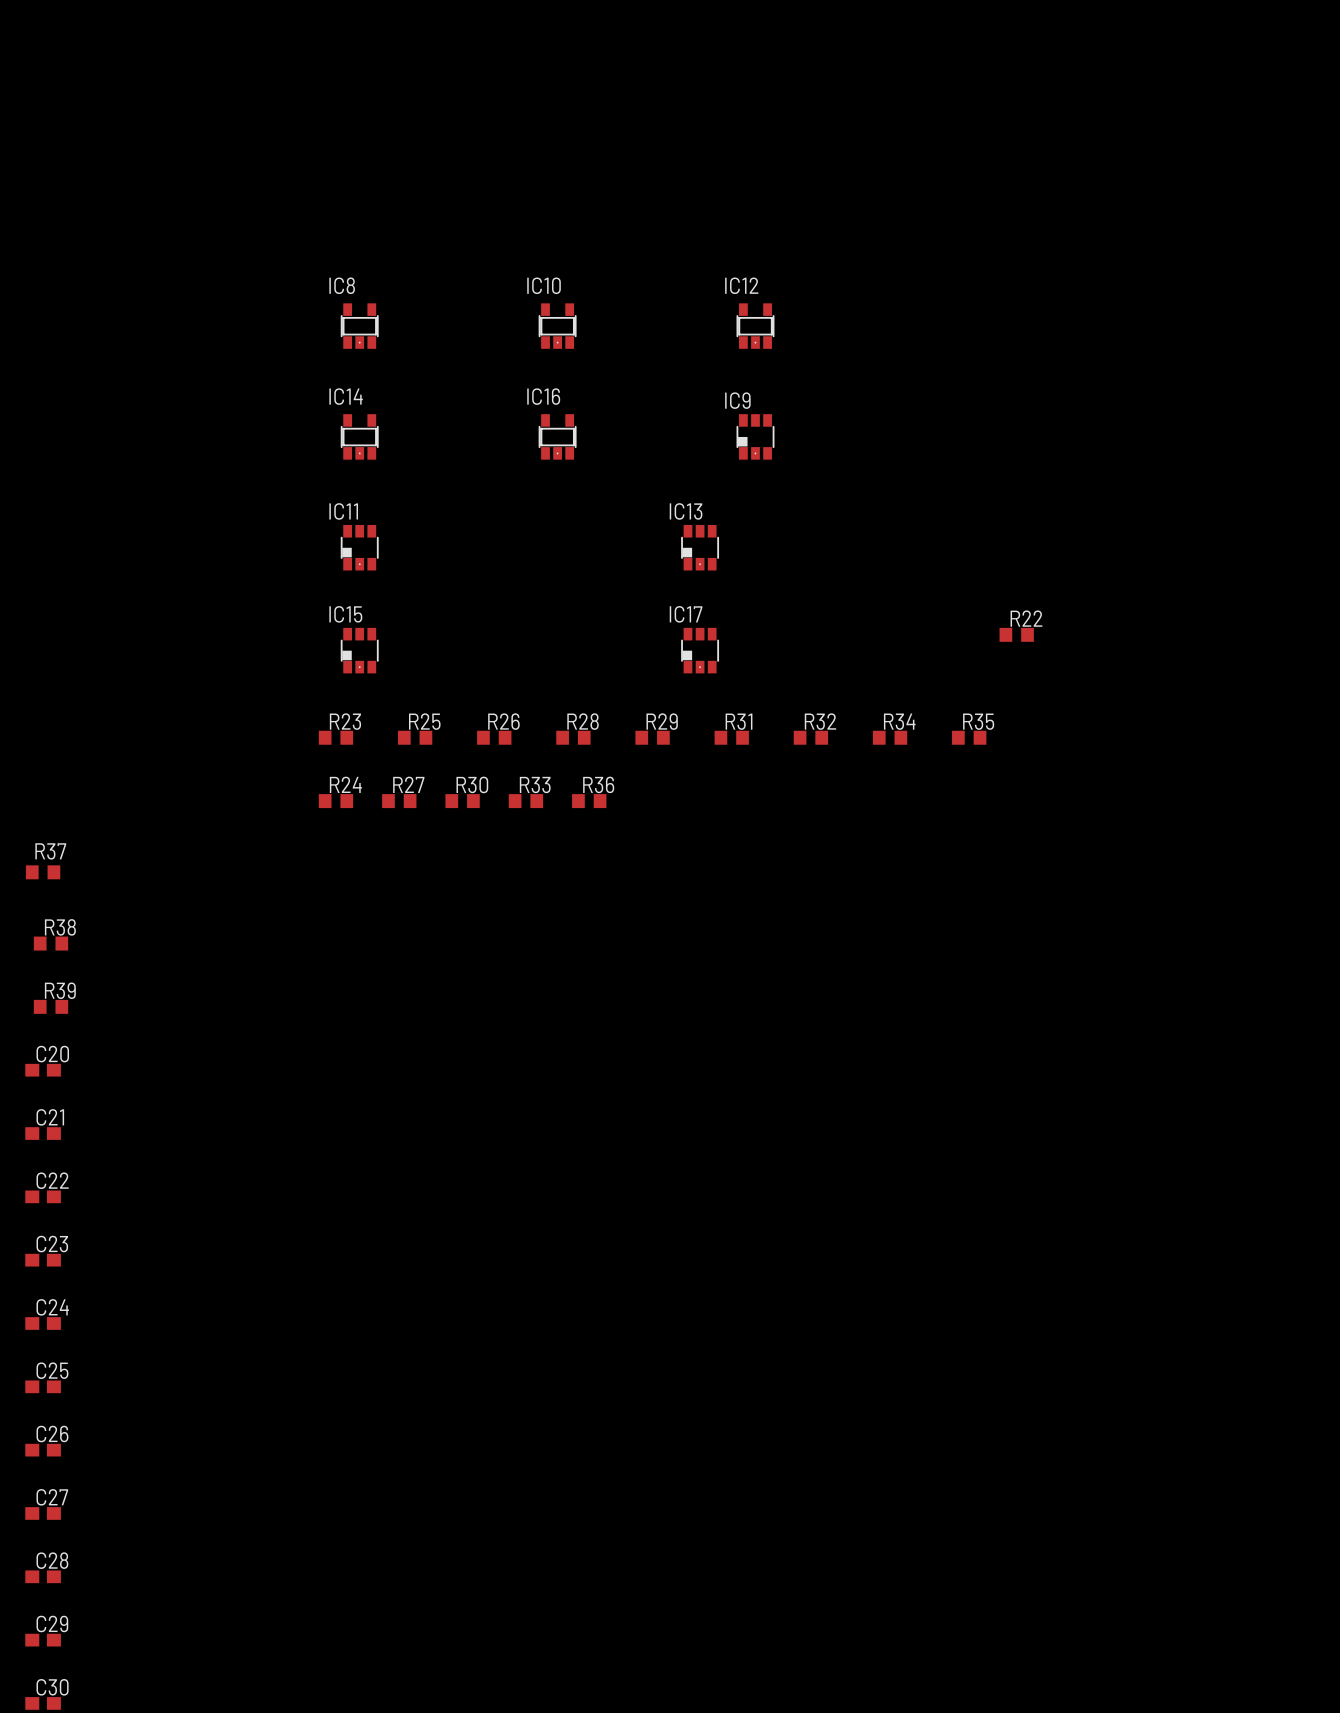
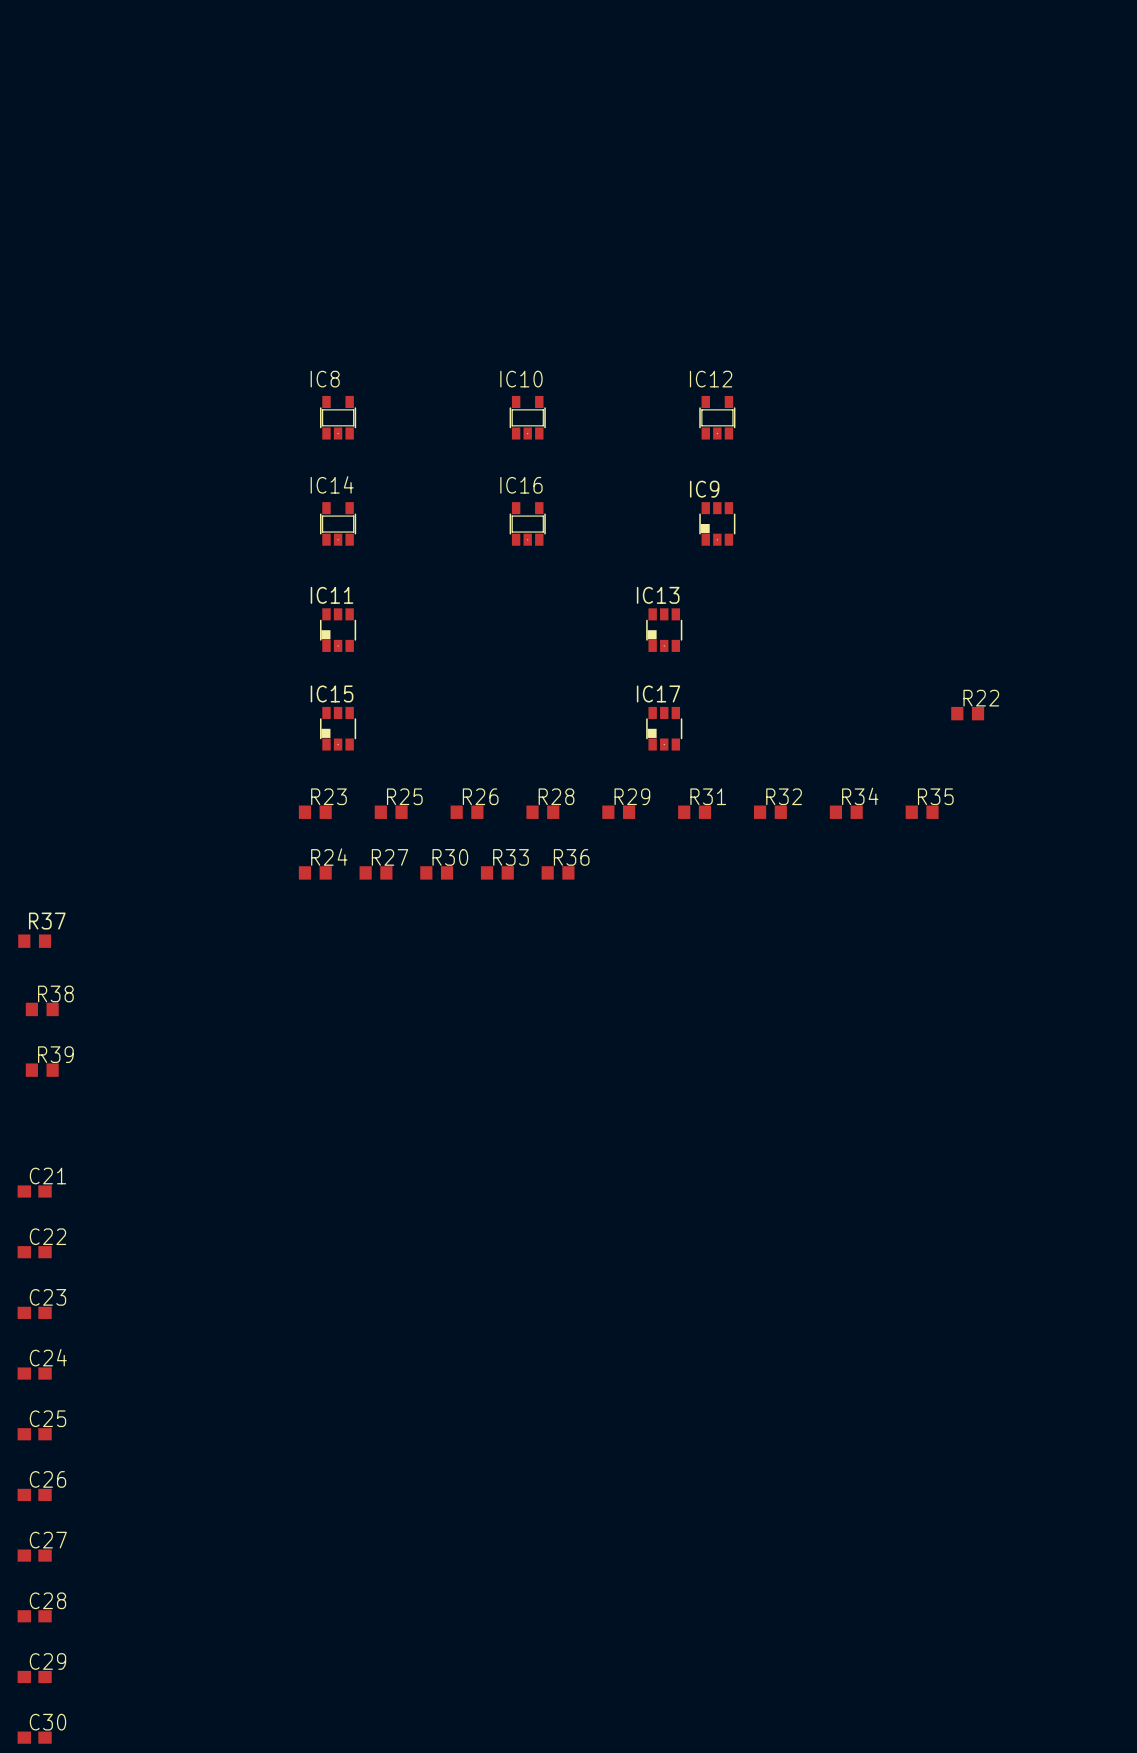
C20: (43, 1070) -> none

